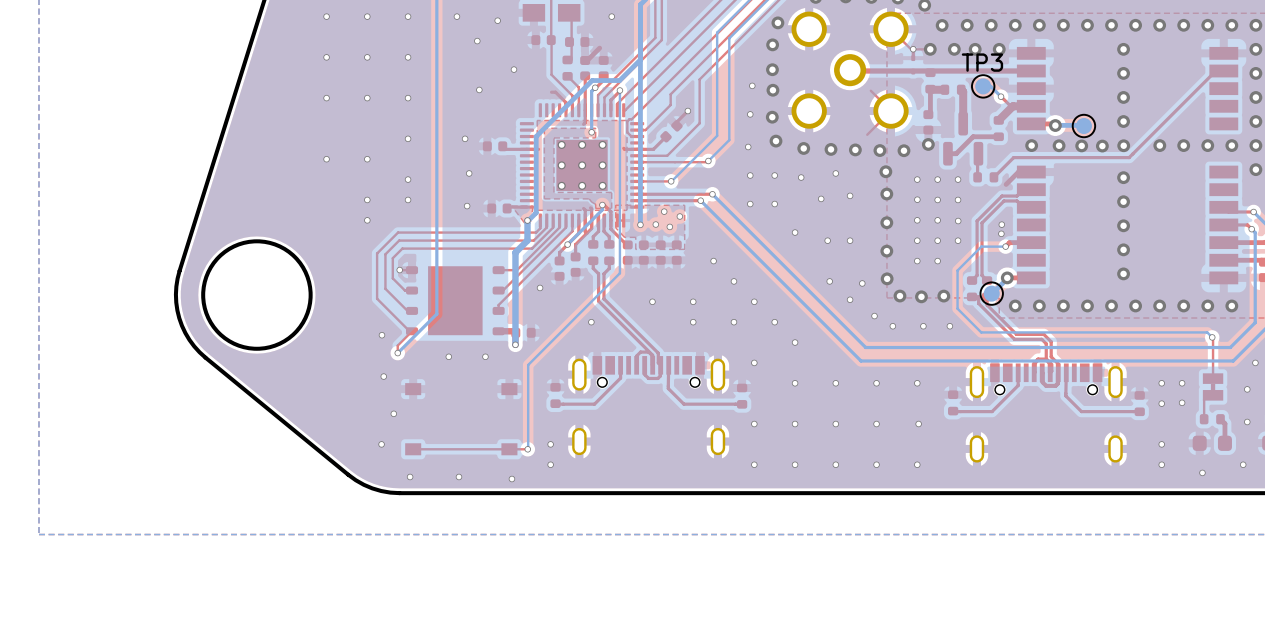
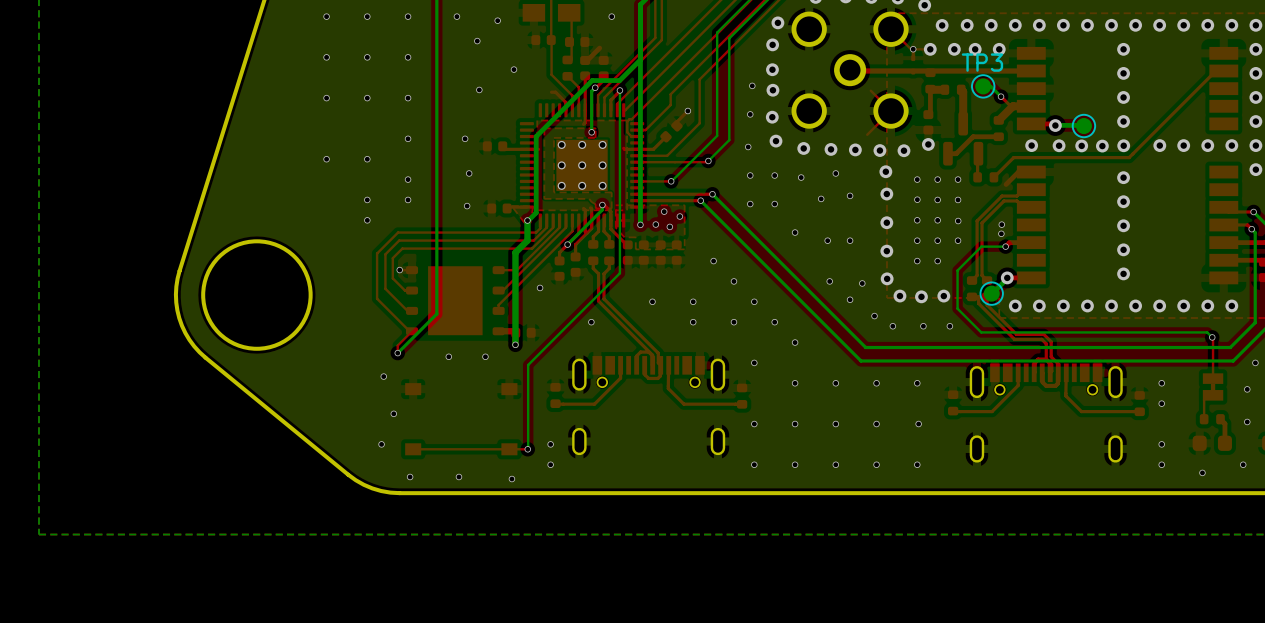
via: (381, 335) -> none
via: (1182, 383) -> none
via: (1182, 402) -> none

